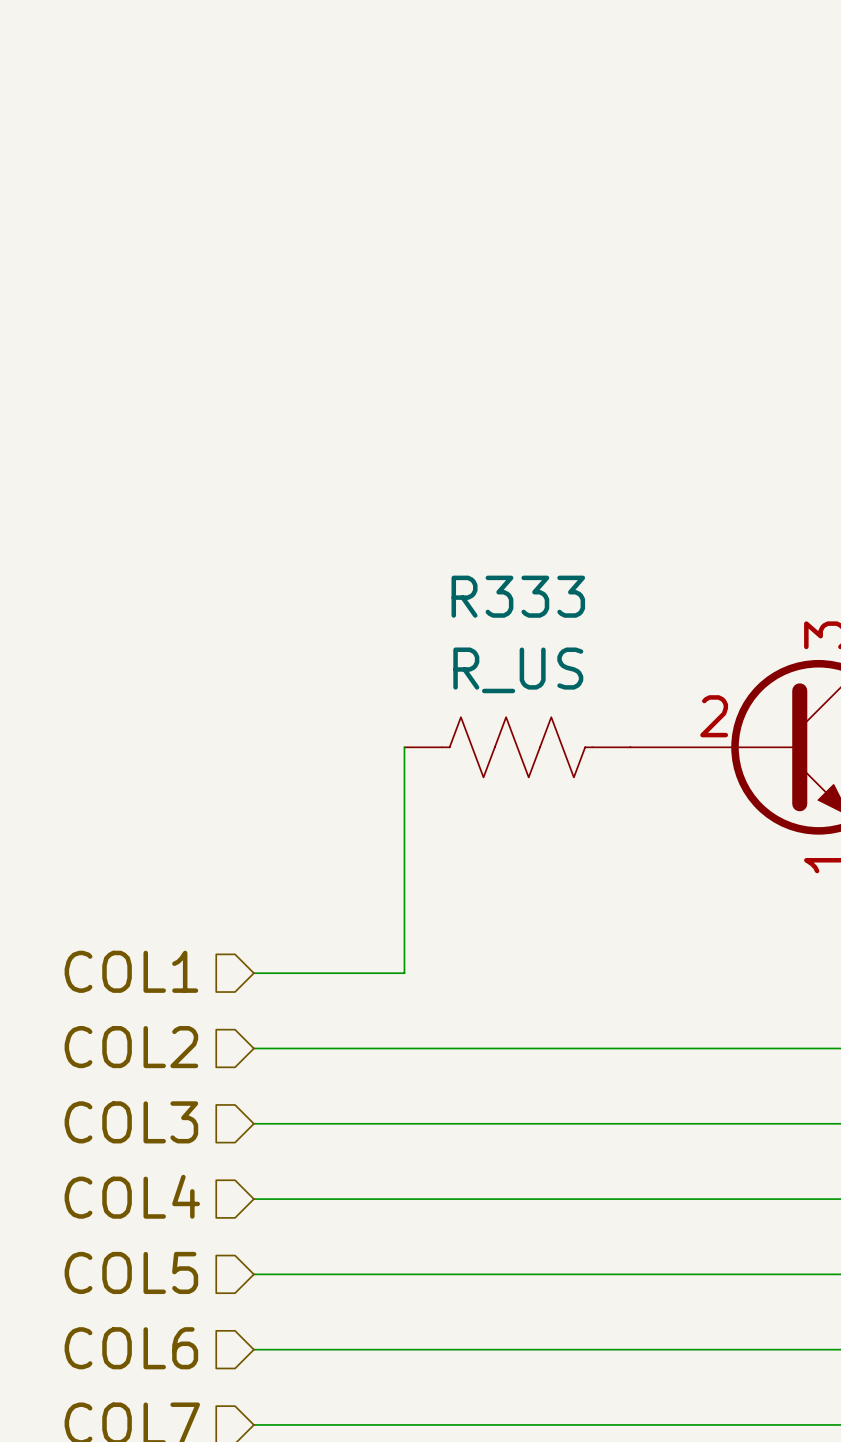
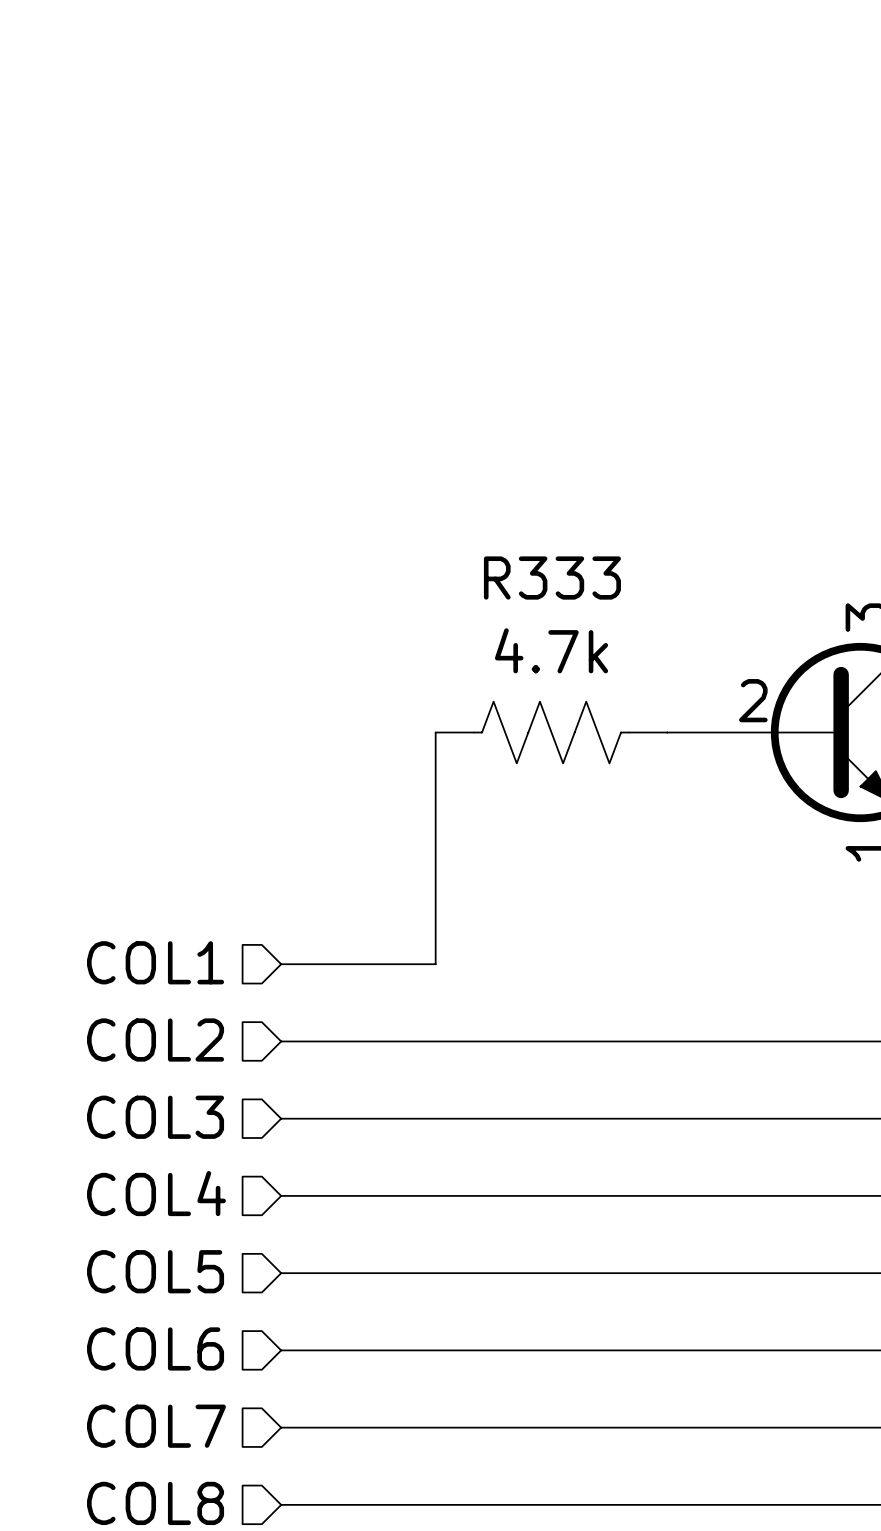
R333 value: R_US (518, 670) -> 4.7k (551, 650)

